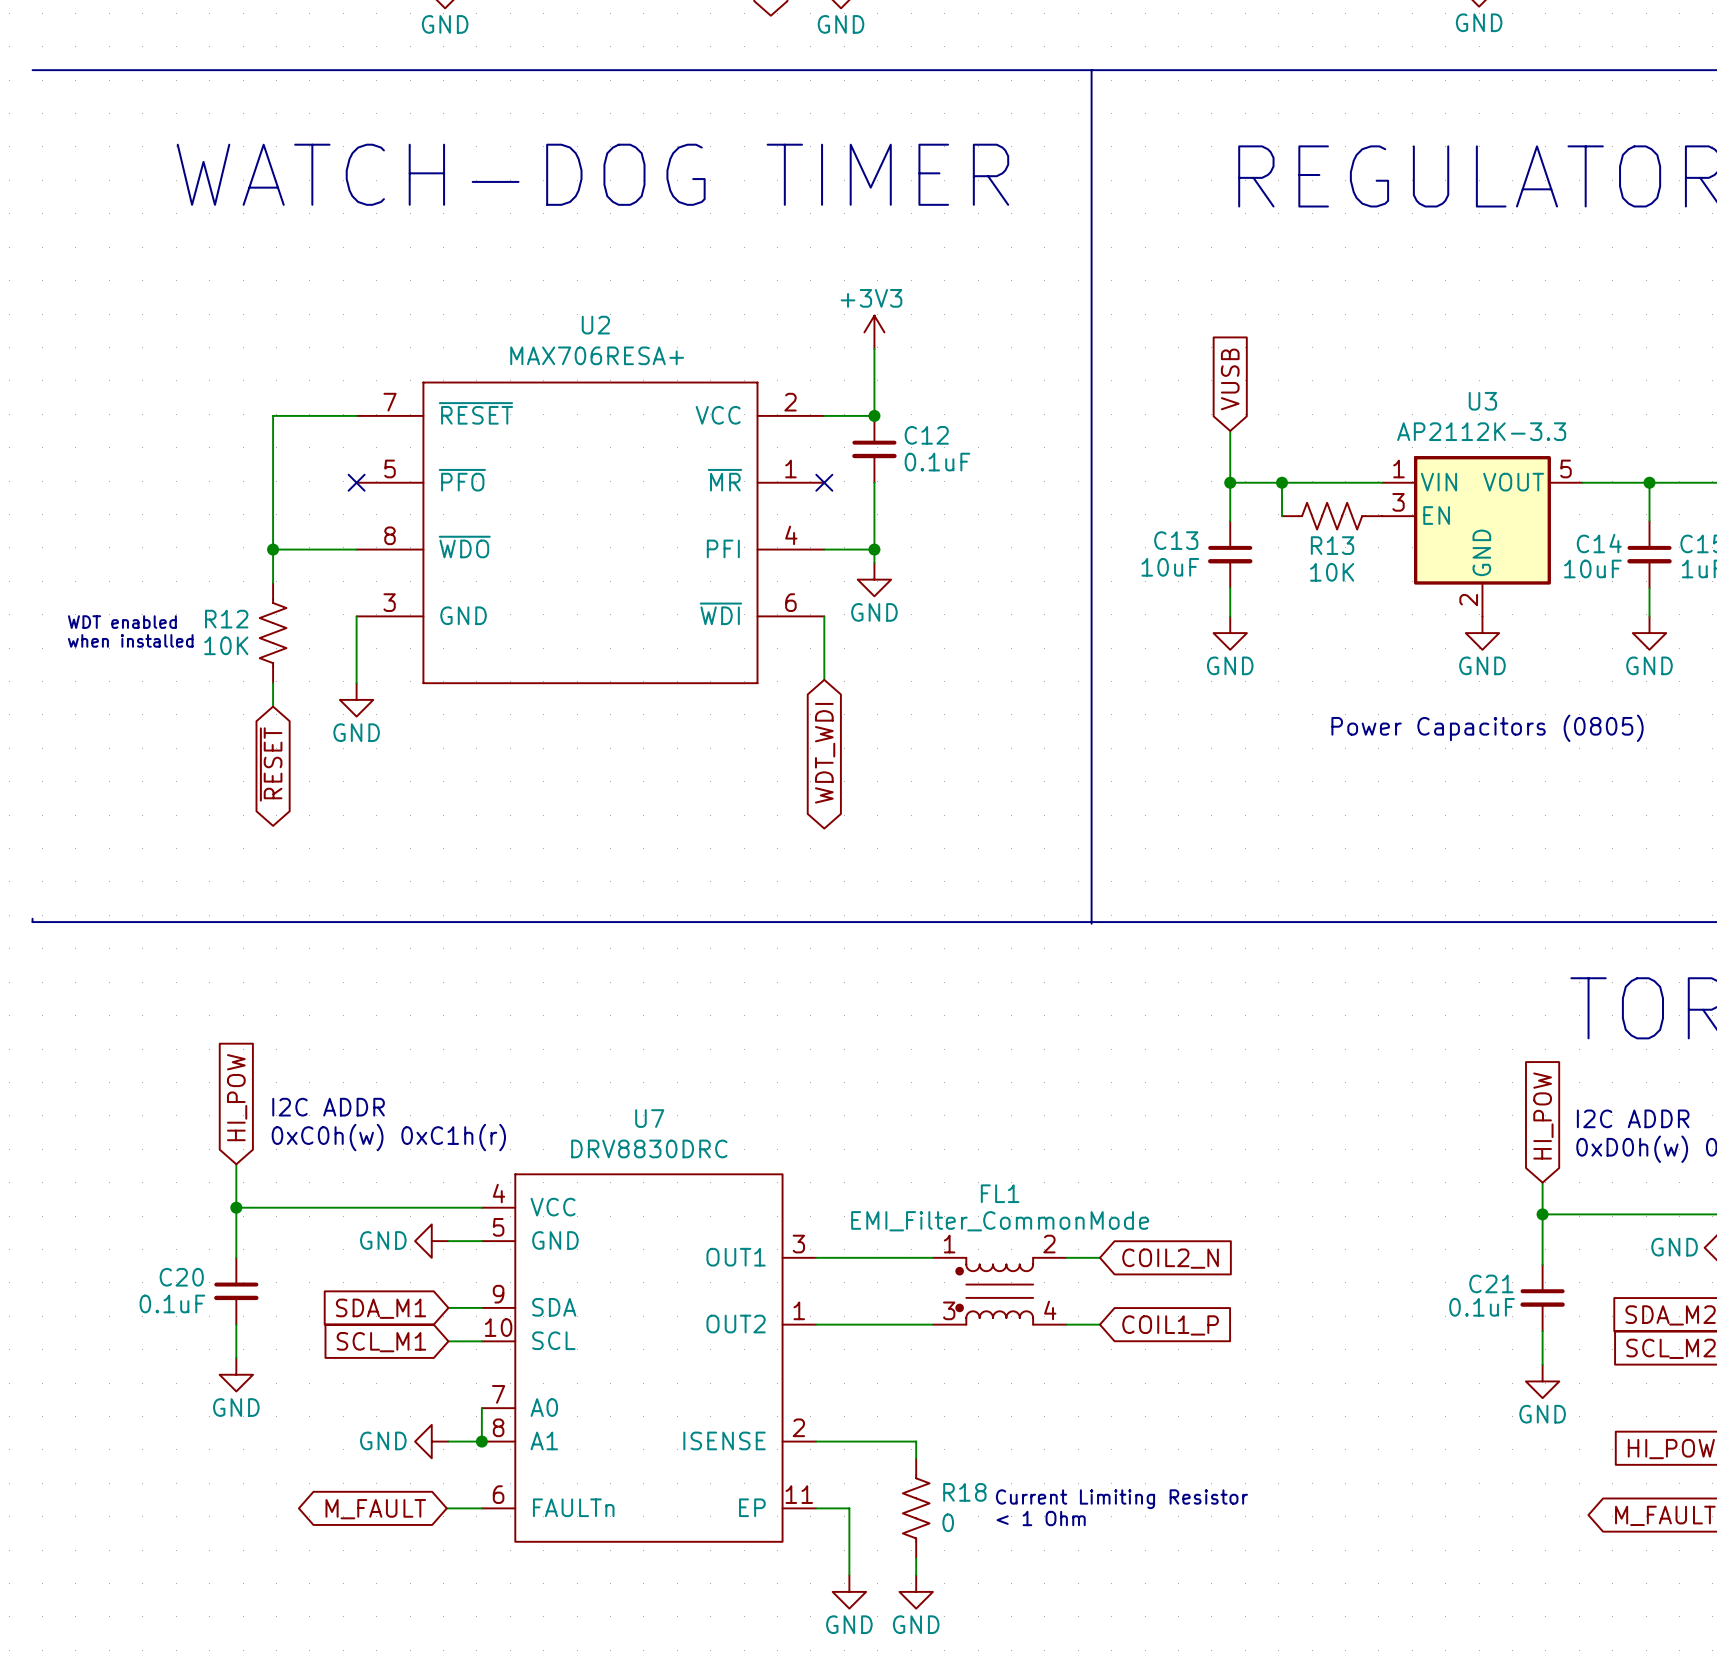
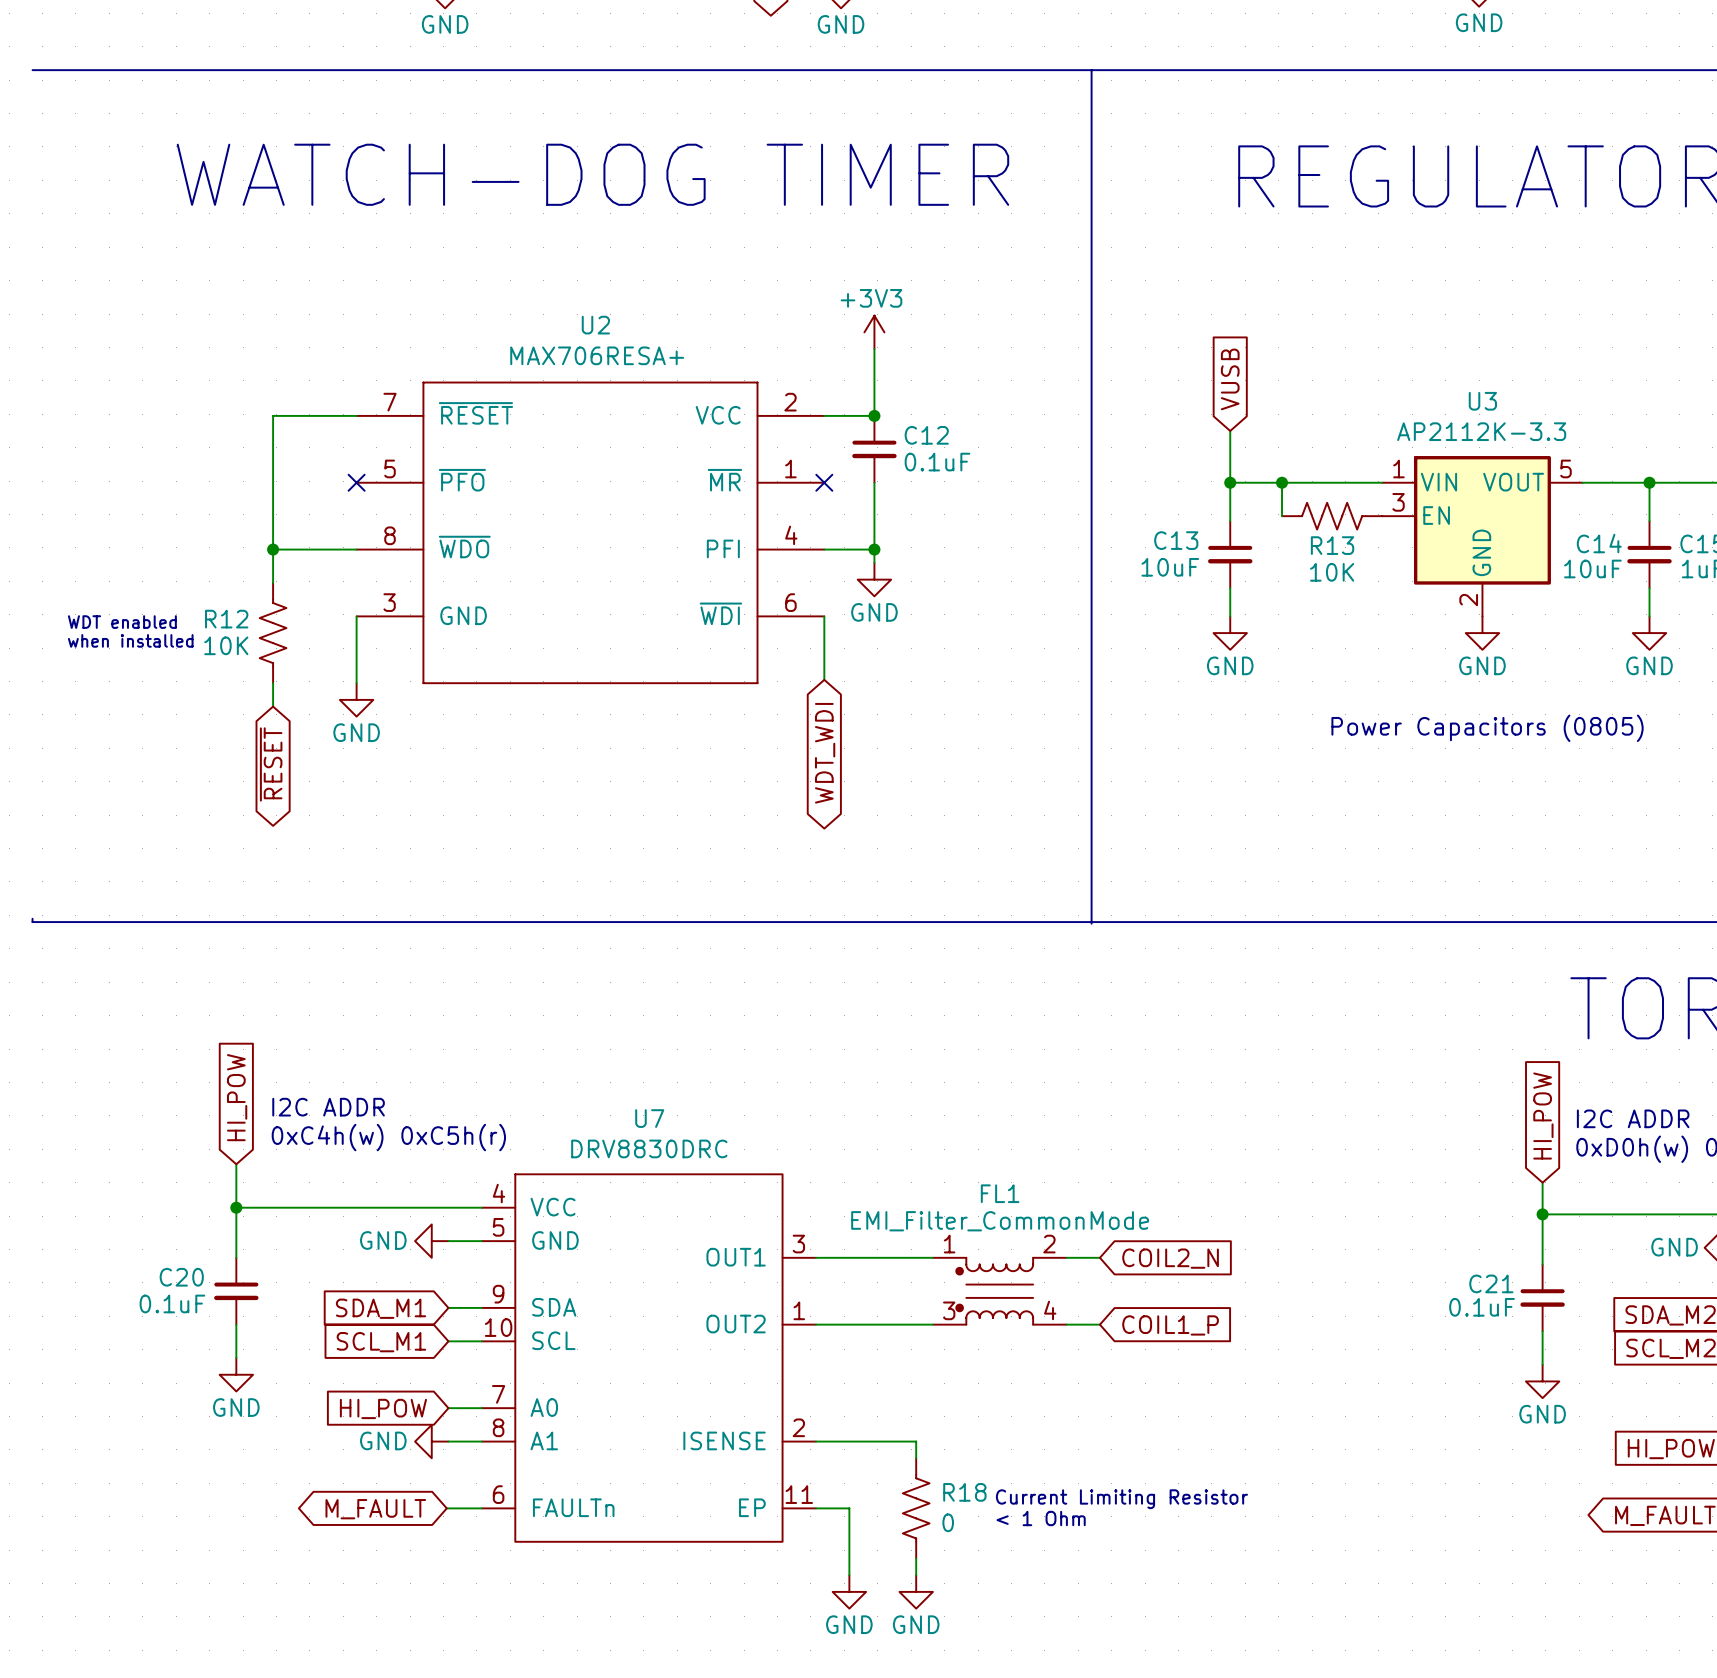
text: 0xC0h(w) 0xC1h(r) (388, 1137) -> 0xC4h(w) 0xC5h(r) (388, 1137)
global label: none -> HI_POW (383, 1408)
wire: (481, 1408) (481, 1441) -> (481, 1408) (448, 1408)
junction: (481, 1441) -> none

